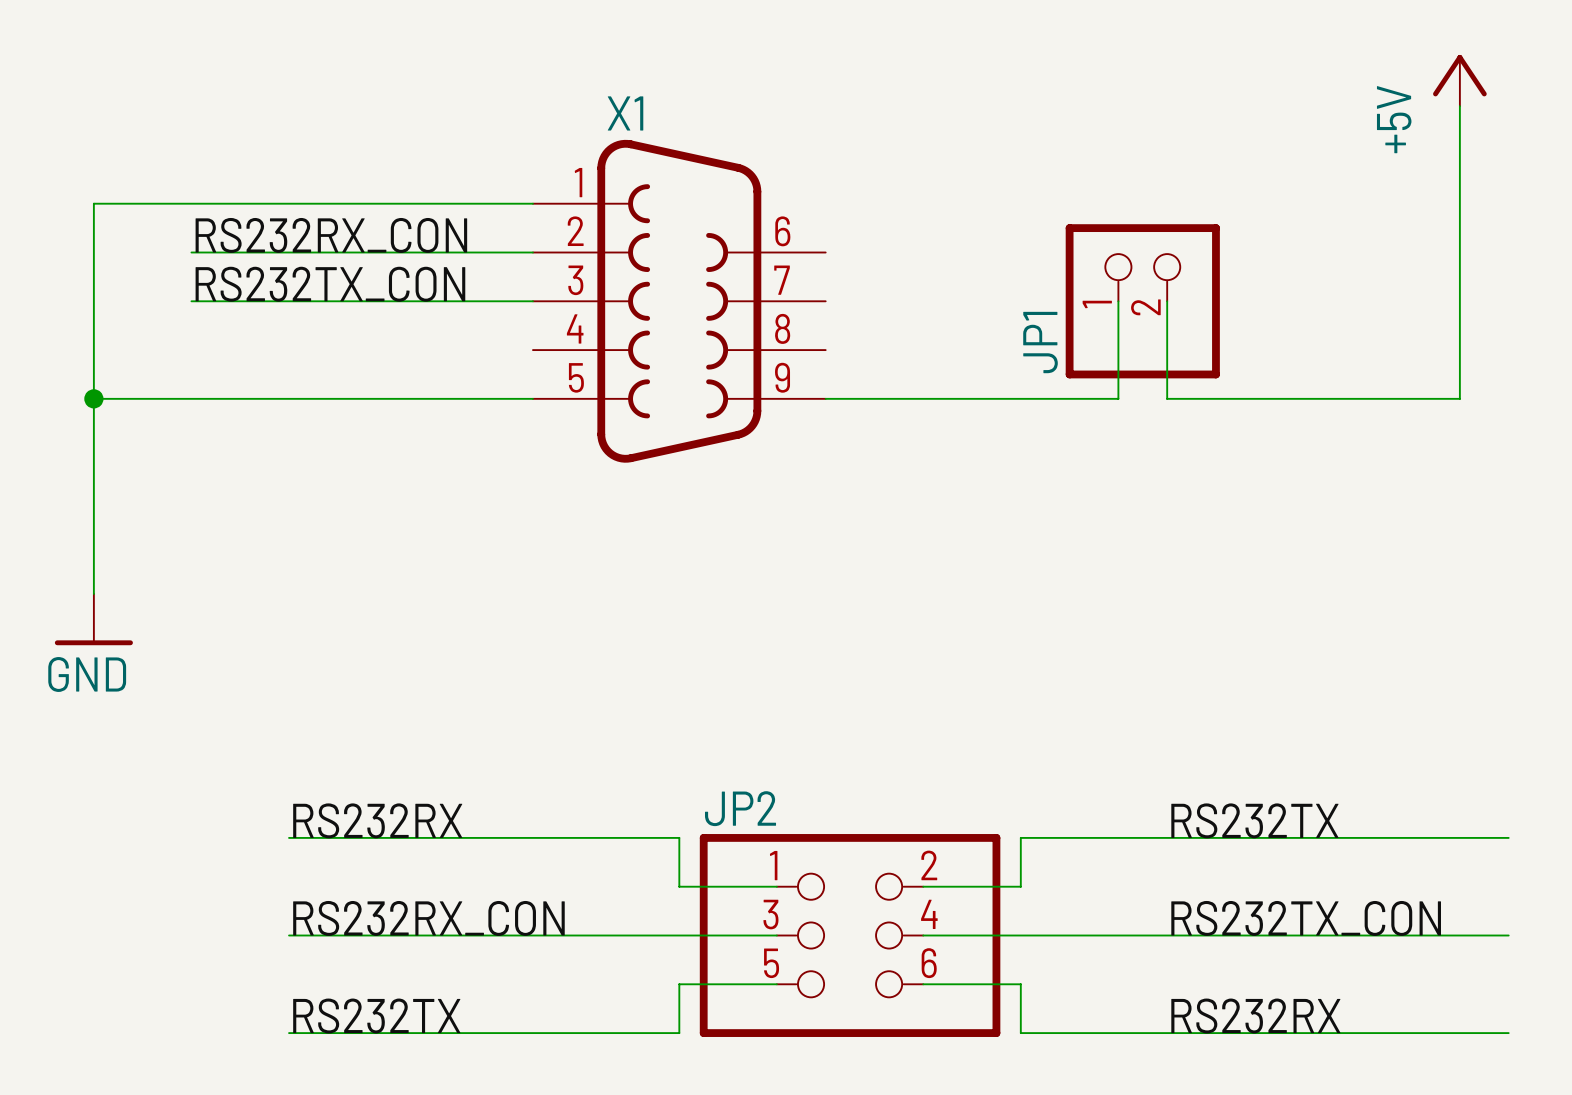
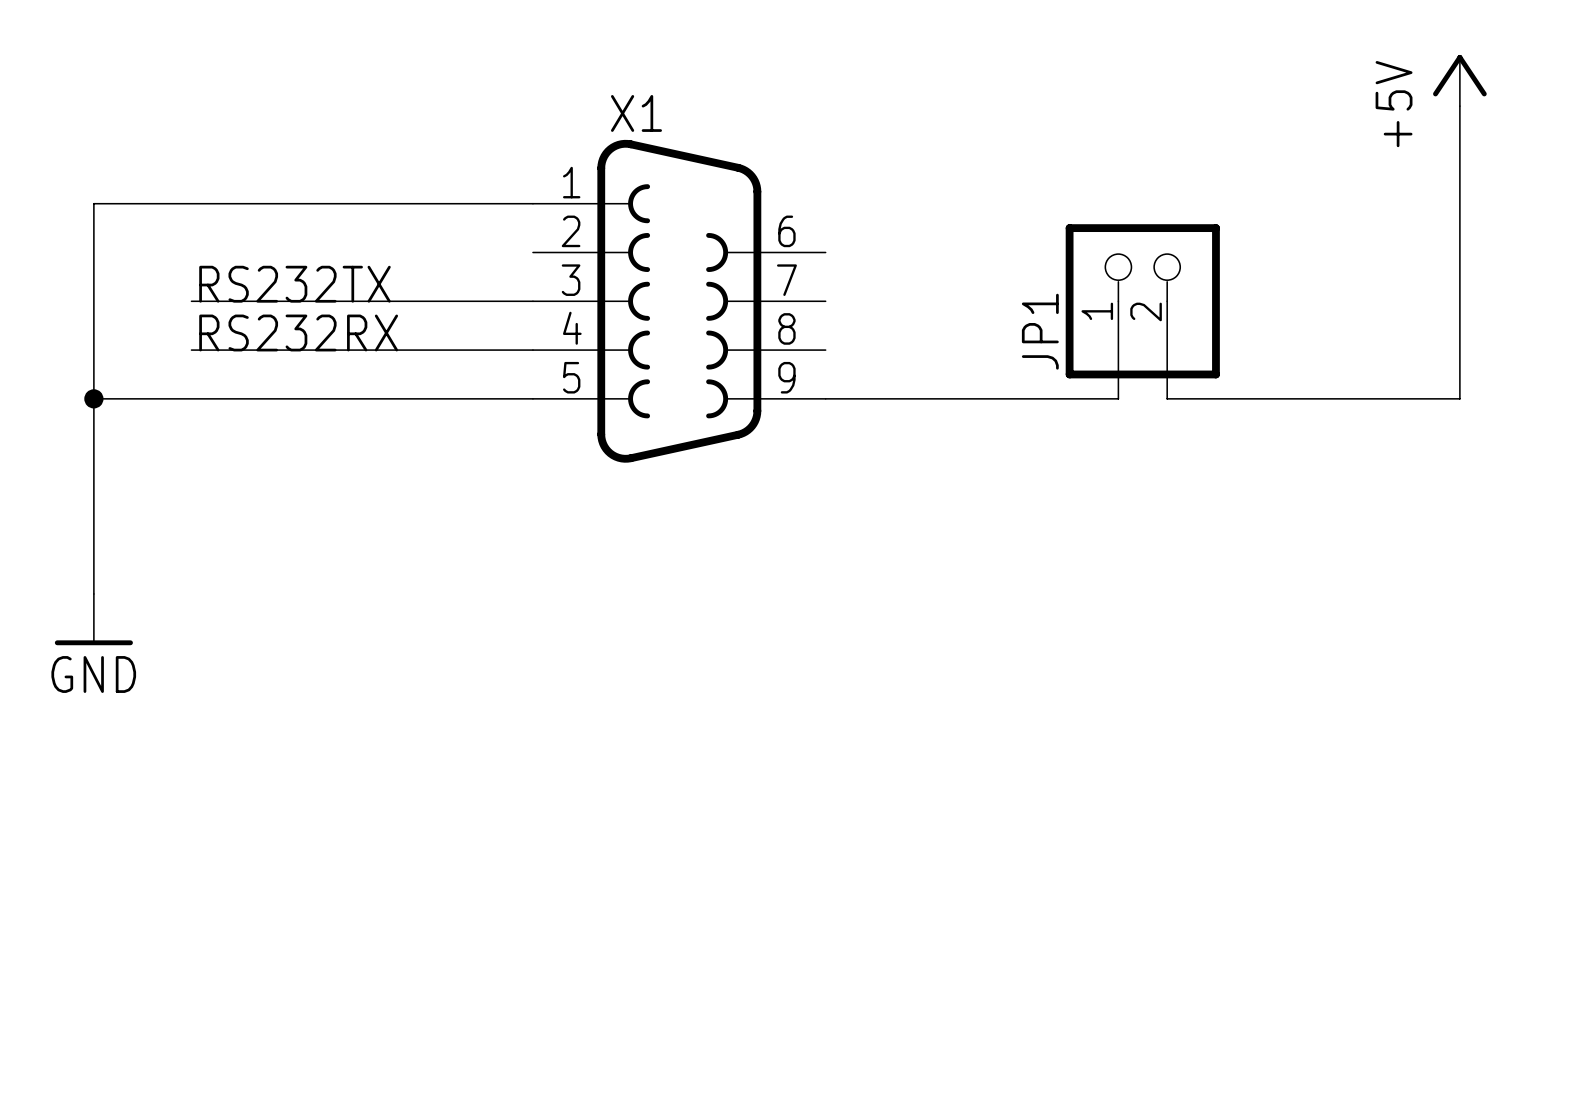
label: RS232RX_CON (331, 235) -> none
wire: (191, 252) (532, 252) -> (191, 350) (532, 350)
label: RS232TX_CON (330, 284) -> RS232TX (294, 284)
label: none -> RS232RX (298, 332)
label: RS232RX (377, 820) -> none
label: RS232TX (1254, 820) -> none
wire: (289, 837) (679, 837) (679, 886) (776, 886) -> none
wire: (1508, 837) (1020, 837) (1020, 886) (923, 886) -> none
label: RS232RX_CON (428, 918) -> none
label: RS232TX_CON (1306, 918) -> none
wire: (289, 935) (776, 935) -> none
JP2: (850, 935) -> none
wire: (923, 935) (1508, 935) -> none
wire: (776, 984) (679, 984) (679, 1033) (289, 1033) -> none
wire: (923, 984) (1020, 984) (1020, 1033) (1508, 1033) -> none
label: RS232TX (376, 1016) -> none
label: RS232RX (1255, 1016) -> none

